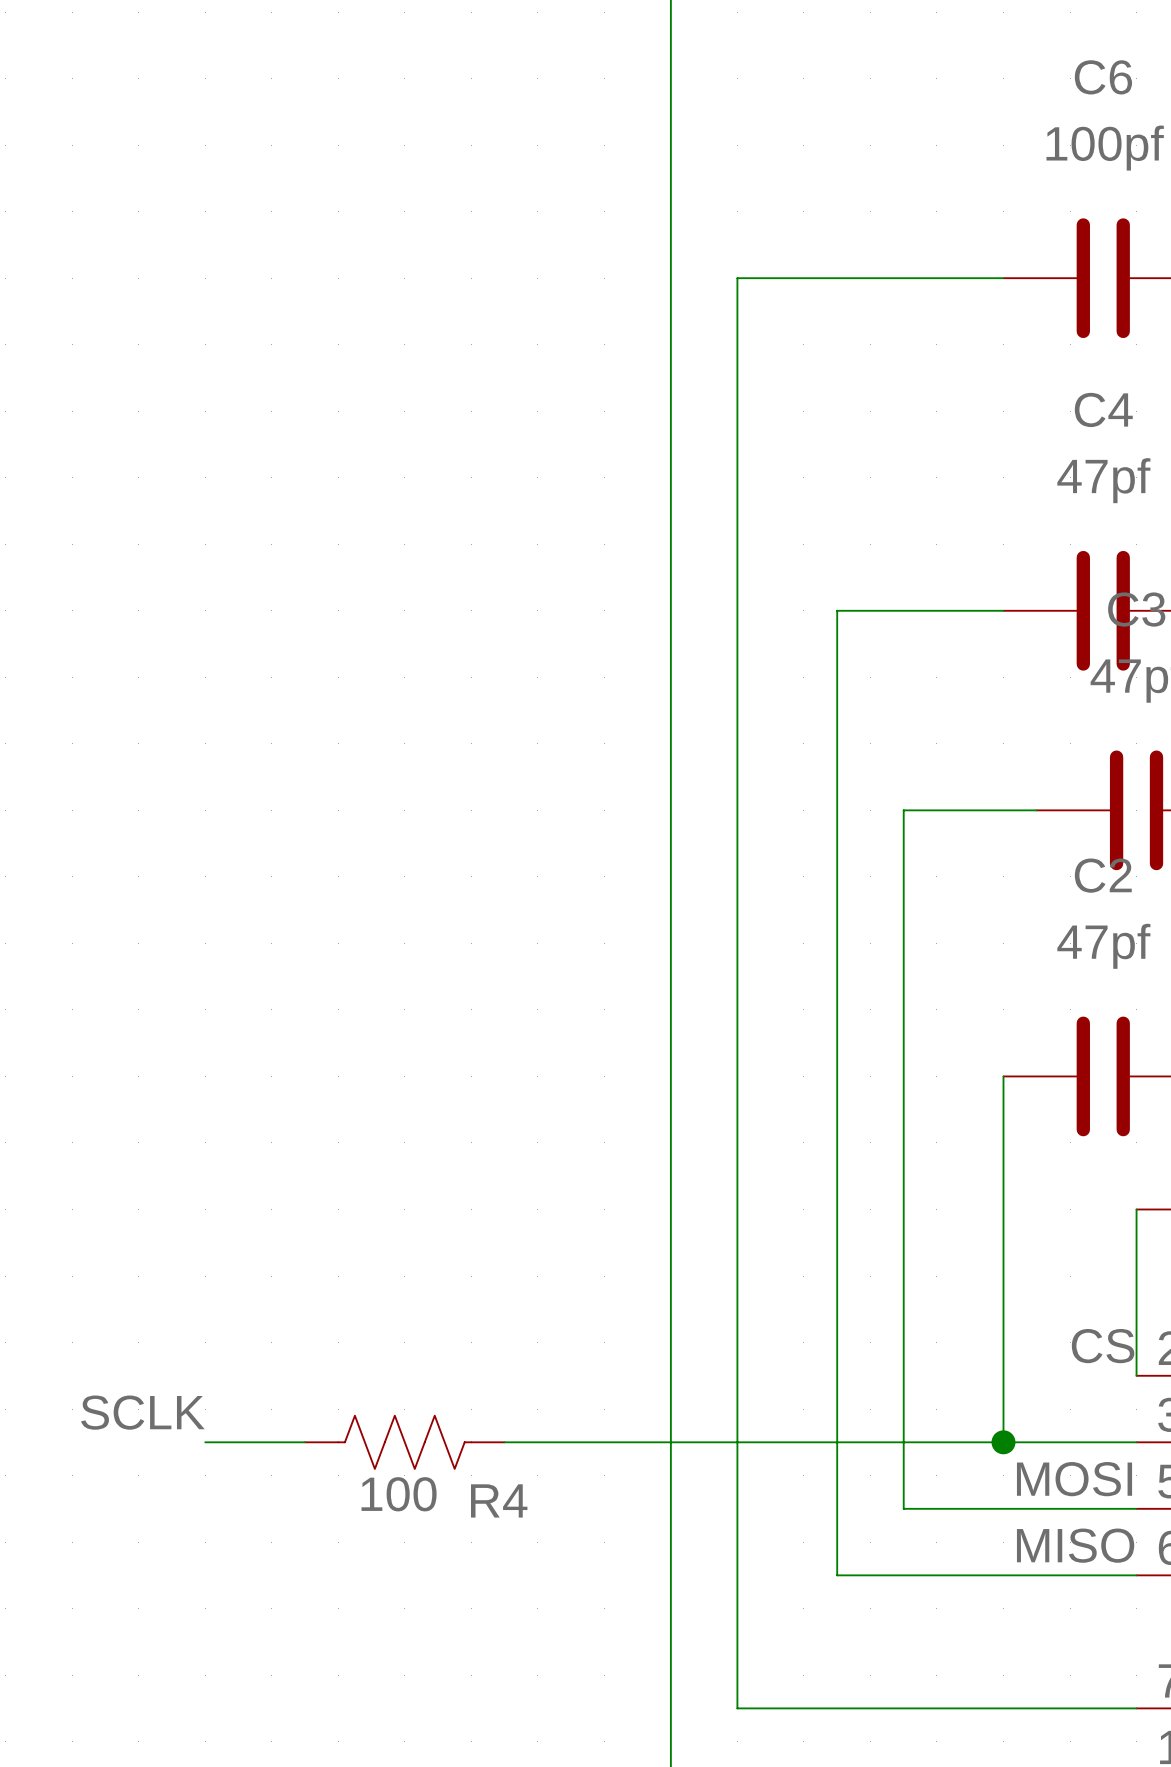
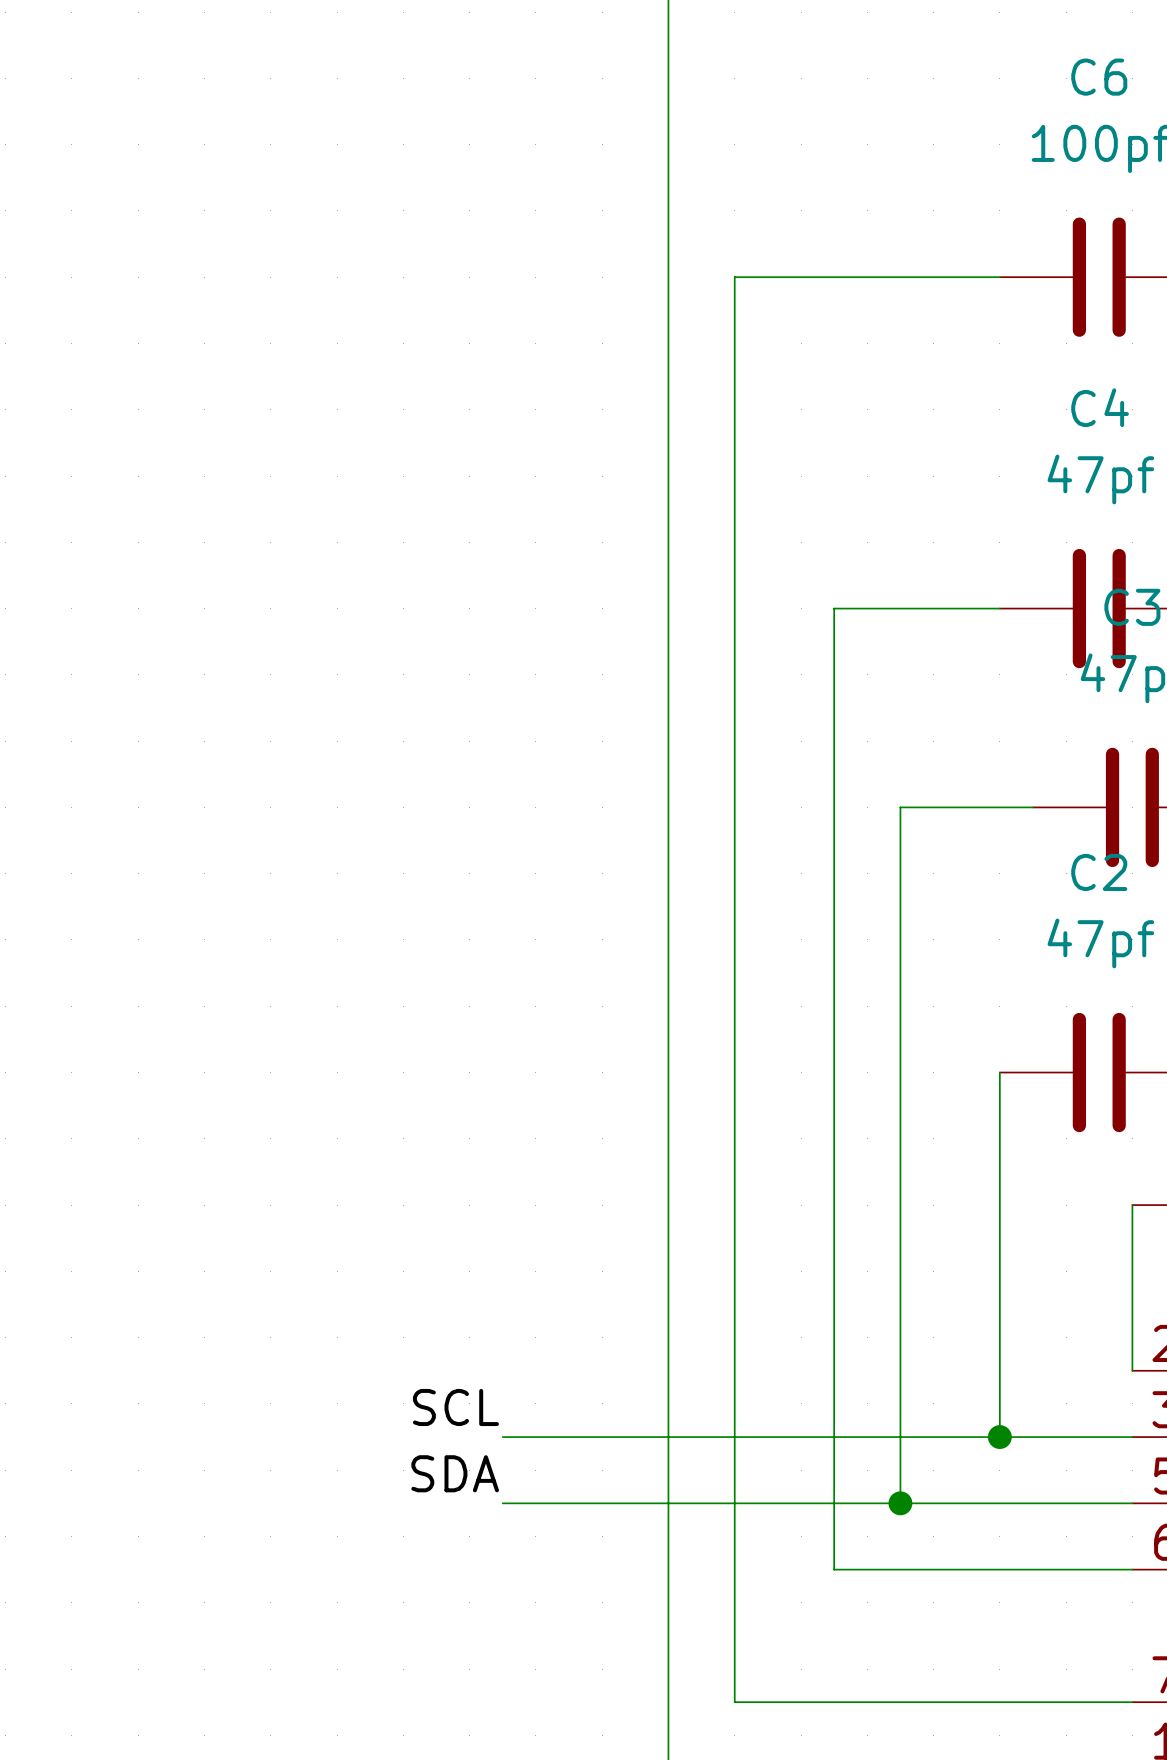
label: CS (1103, 1346) -> none
label: SCLK (142, 1412) -> none
label: none -> SCL (455, 1407)
wire: (205, 1442) (305, 1442) -> none
R4: 100 (404, 1442) -> none
label: none -> SDA (455, 1473)
label: MOSI (1074, 1479) -> none
wire: none -> (502, 1503) (900, 1503)
junction: none -> (900, 1503)
label: MISO (1075, 1545) -> none

